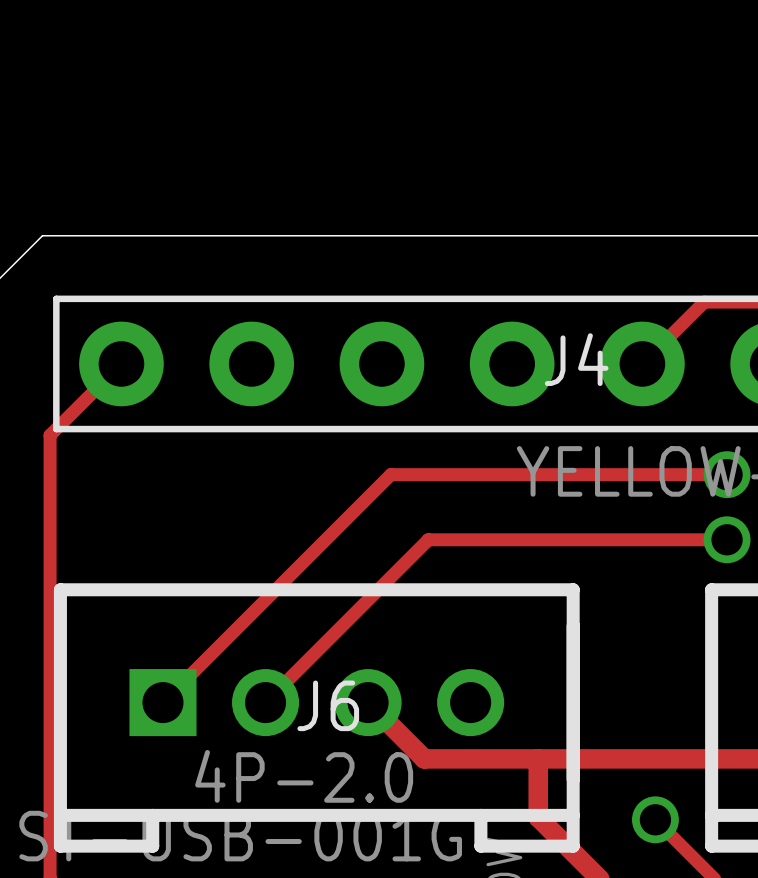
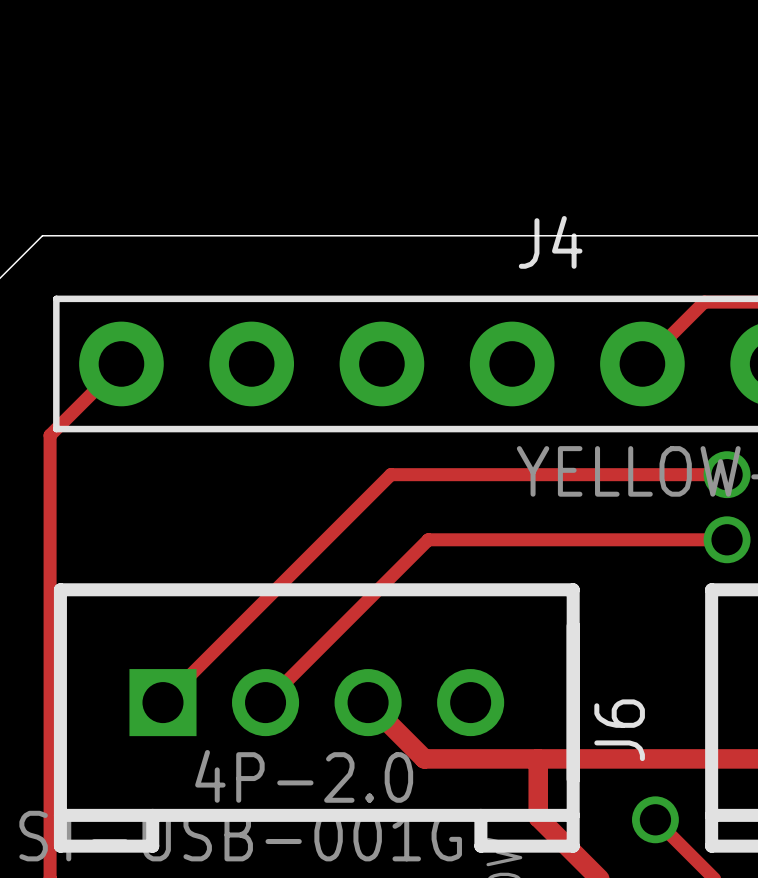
J4 name position: J4 (576, 359) -> J4 (550, 242)
J6 name rotation: 0° (328, 705) -> 90° counterclockwise (619, 730)
J6 name position: J6 (328, 705) -> J6 (619, 730)

